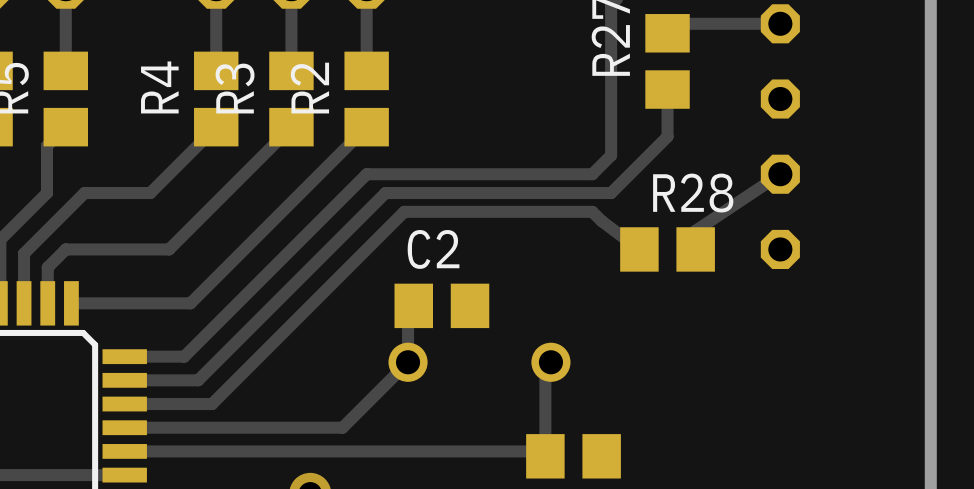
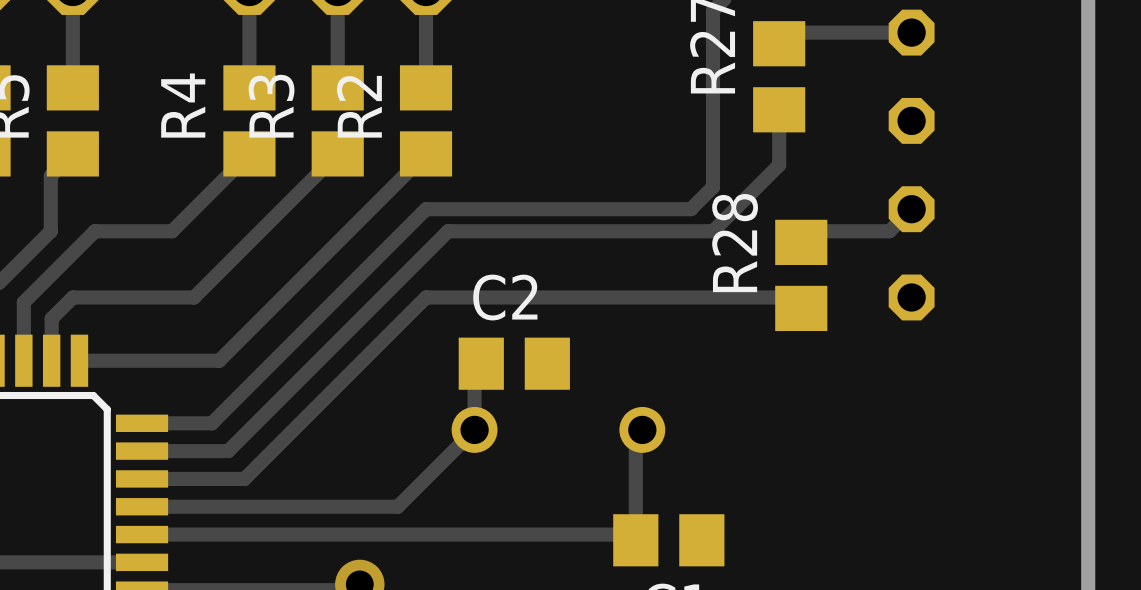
track: (780, 174) (695, 230) (695, 249) -> (911, 209) (889, 231) (812, 231) (801, 242)
R28 name position: R28 (693, 193) -> R28 (735, 243)
track: (639, 249) (592, 211) (404, 211) (366, 249) -> (801, 308) (790, 297) (426, 297)
R28 rotation: 0° (667, 249) -> 90° clockwise (801, 275)

